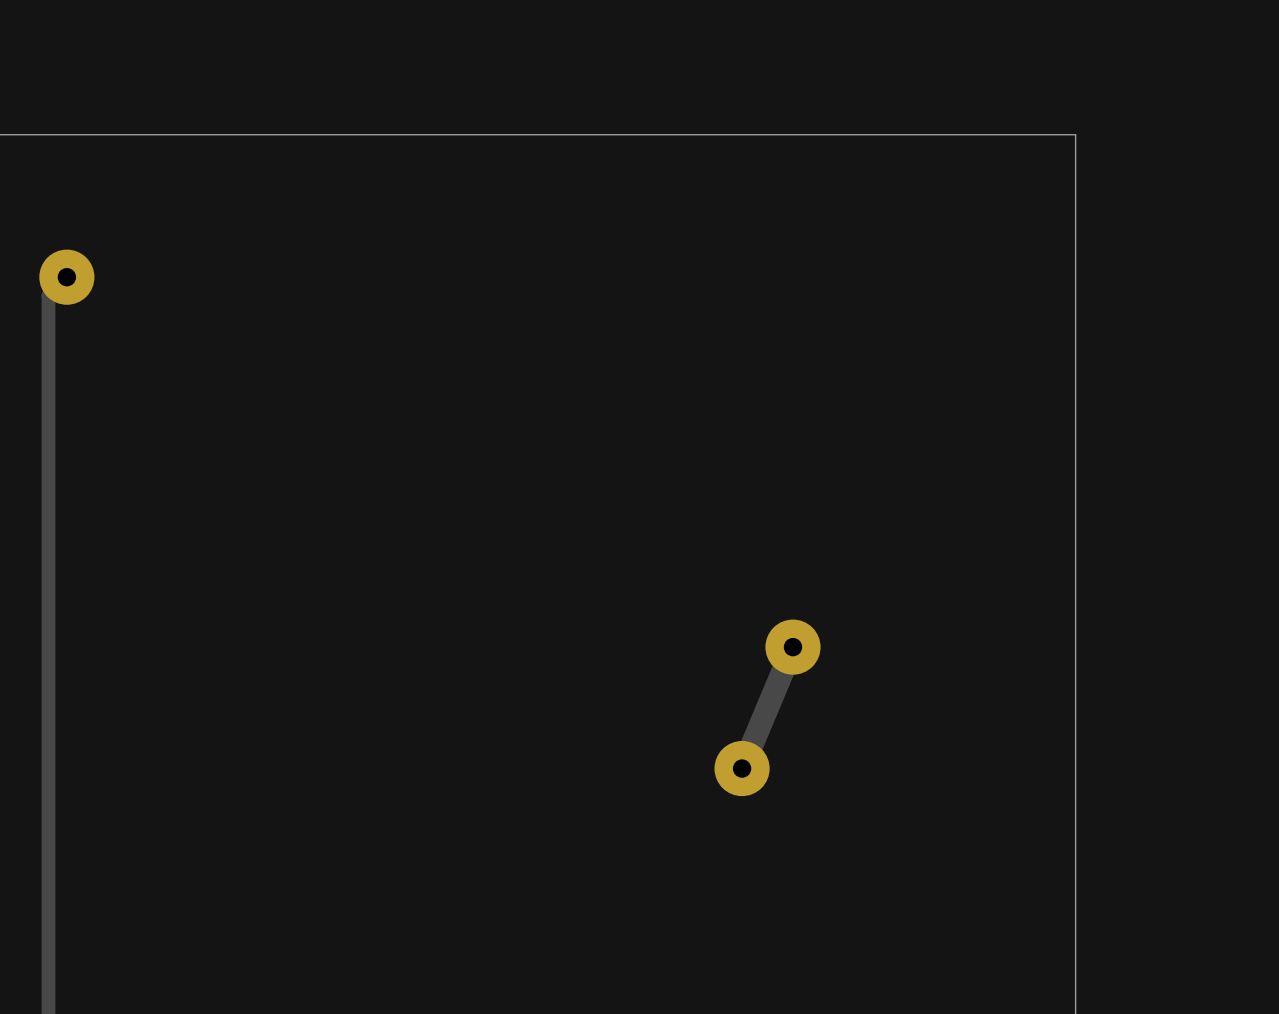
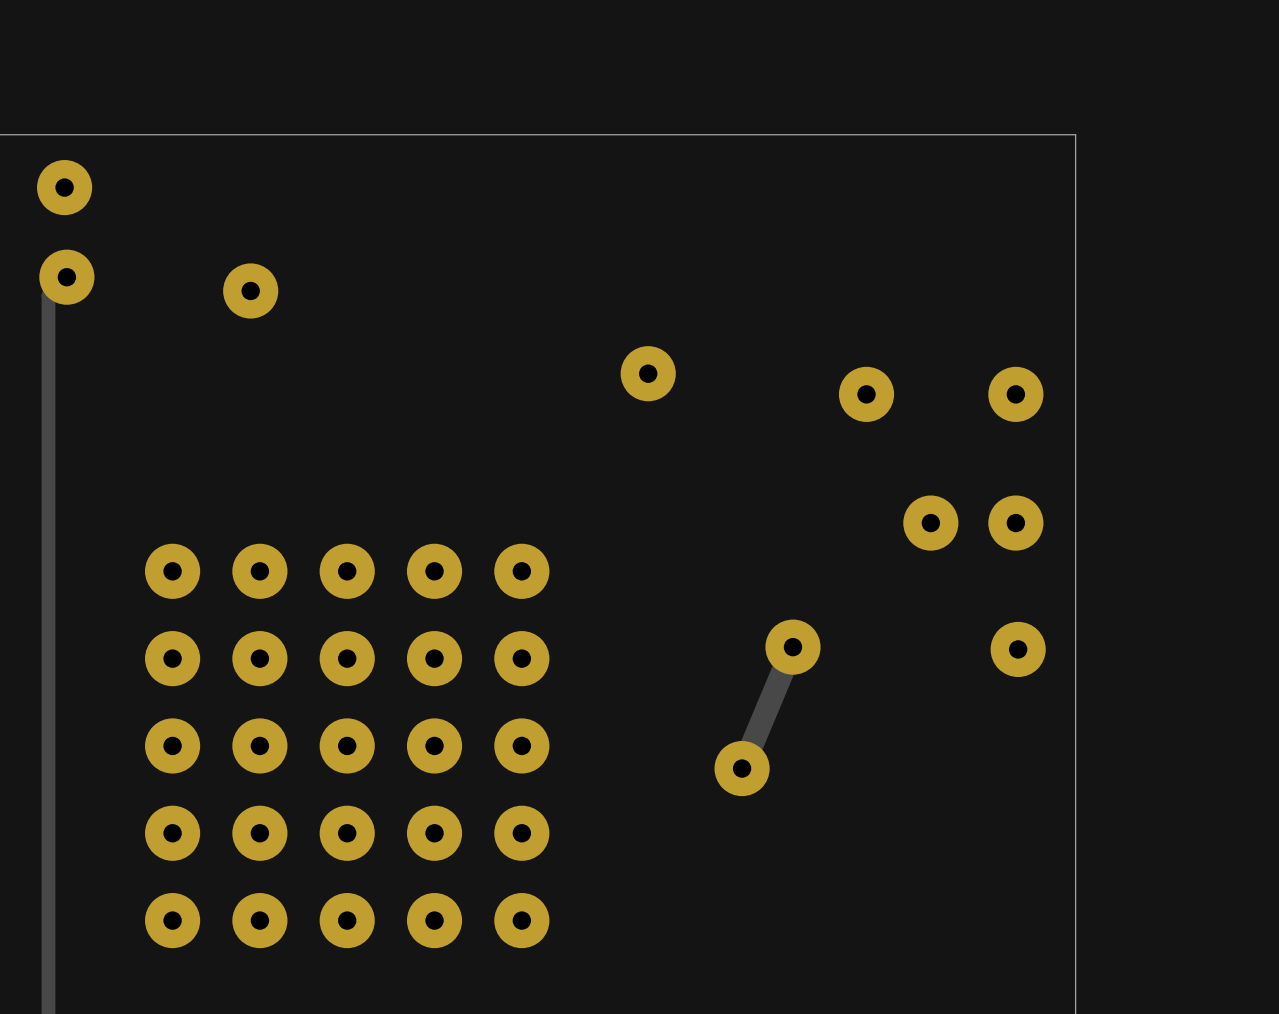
via: none -> (64, 187)
via: none -> (250, 290)
via: none -> (648, 373)
via: none -> (866, 394)
via: none -> (1015, 394)
via: none -> (930, 523)
via: none -> (1015, 523)
via: none -> (172, 571)
via: none -> (259, 571)
via: none -> (347, 571)
via: none -> (434, 571)
via: none -> (521, 571)
via: none -> (1018, 649)
via: none -> (172, 658)
via: none -> (259, 658)
via: none -> (347, 658)
via: none -> (434, 658)
via: none -> (521, 658)
via: none -> (172, 745)
via: none -> (259, 745)
via: none -> (347, 745)
via: none -> (434, 745)
via: none -> (521, 745)
via: none -> (172, 833)
via: none -> (259, 833)
via: none -> (347, 833)
via: none -> (434, 833)
via: none -> (521, 833)
via: none -> (172, 920)
via: none -> (259, 920)
via: none -> (347, 920)
via: none -> (434, 920)
via: none -> (521, 920)

